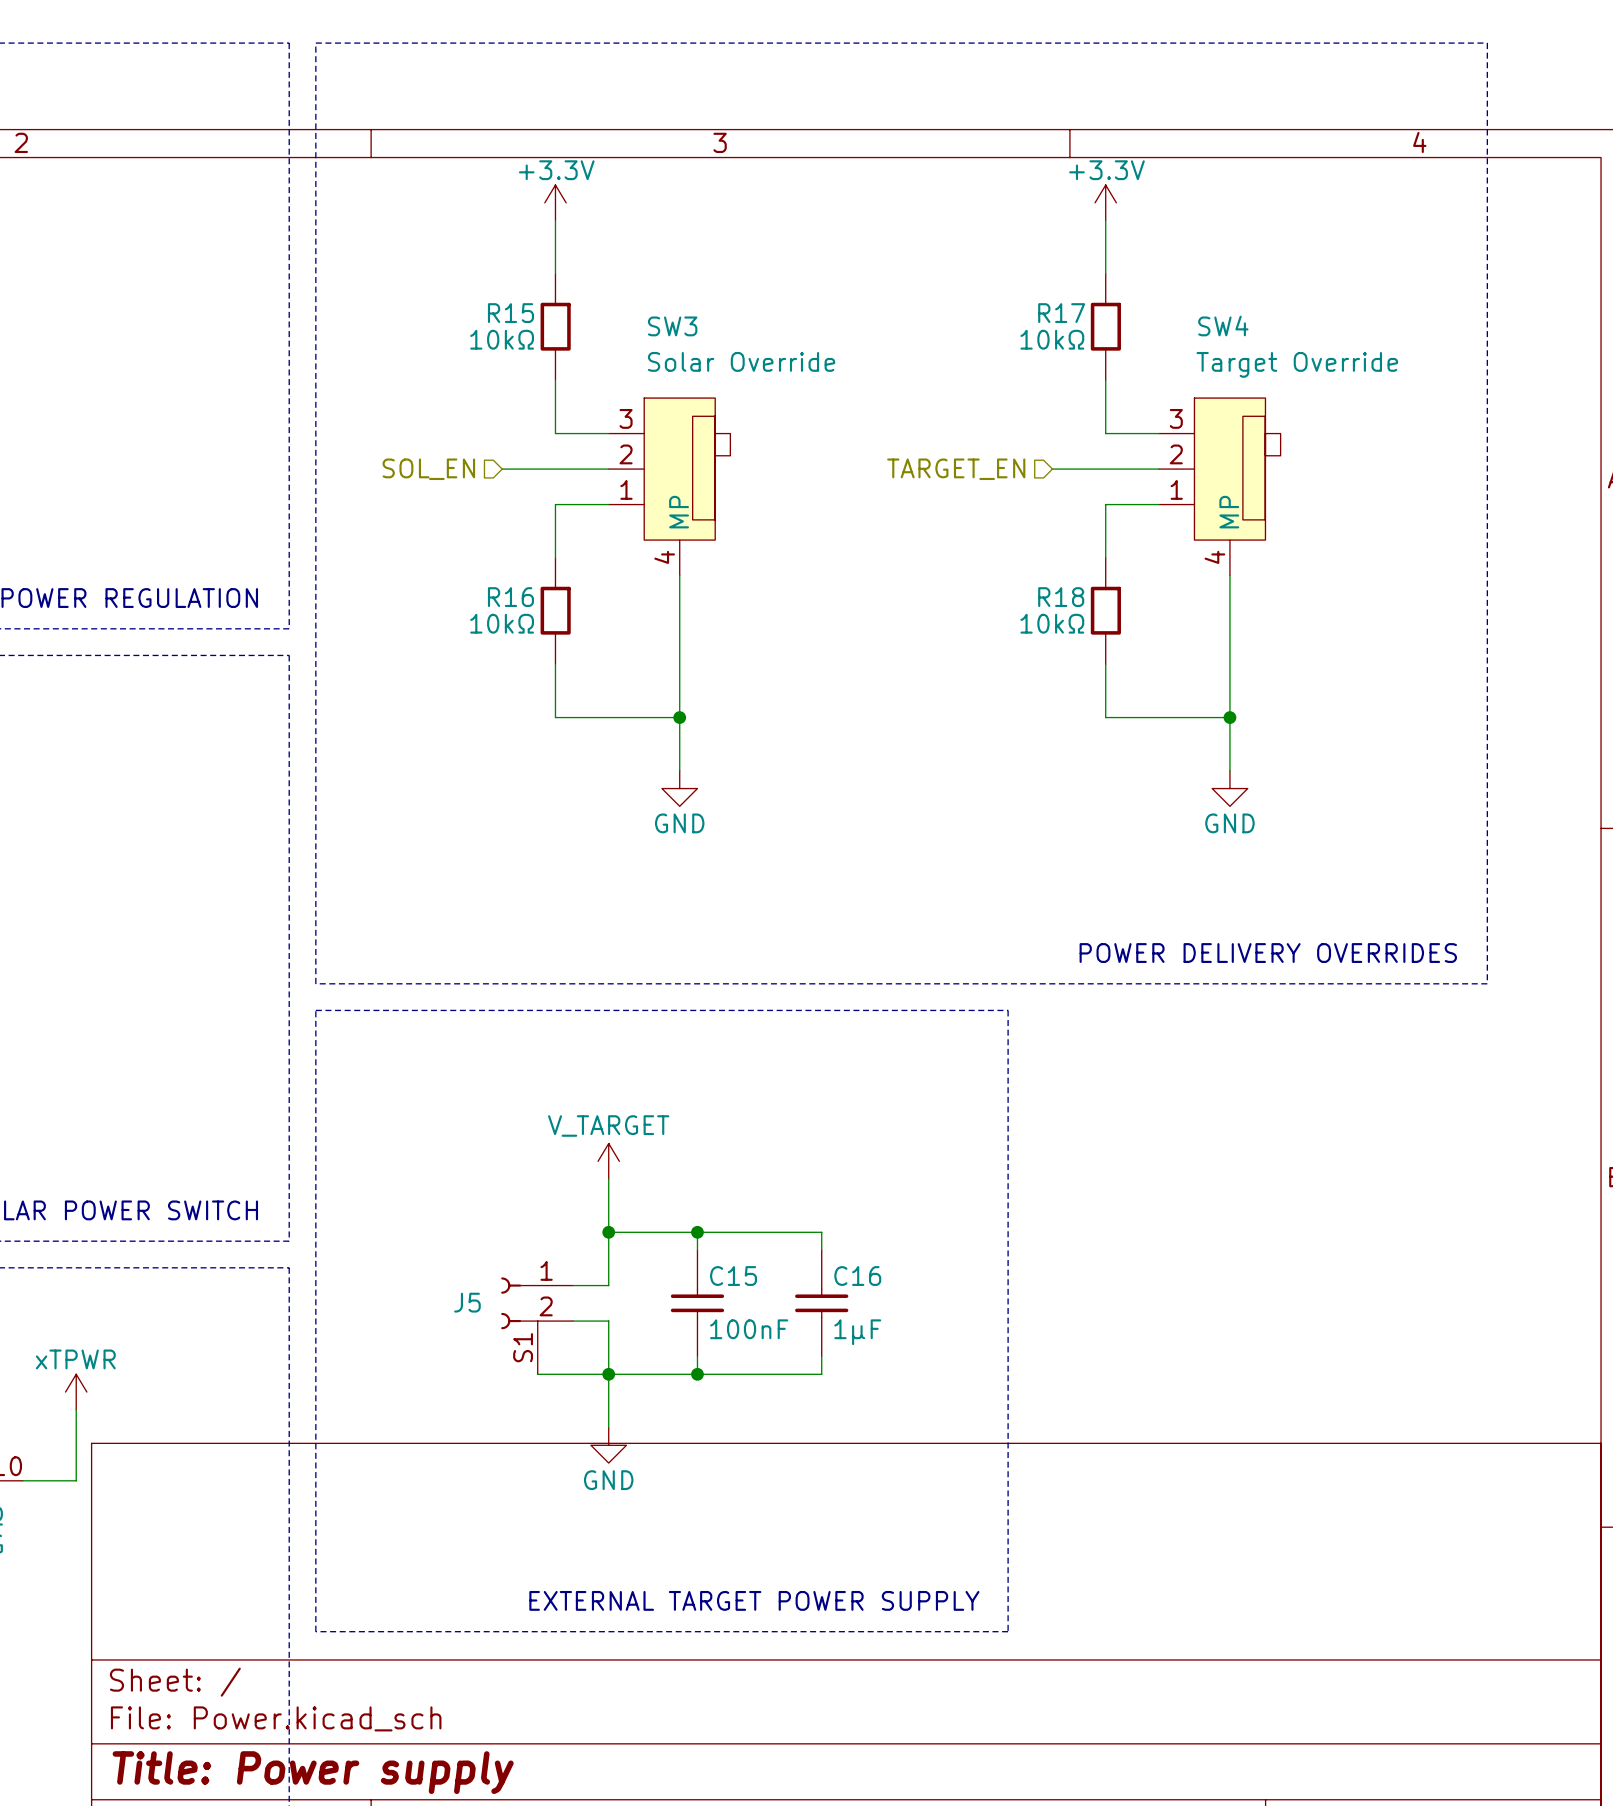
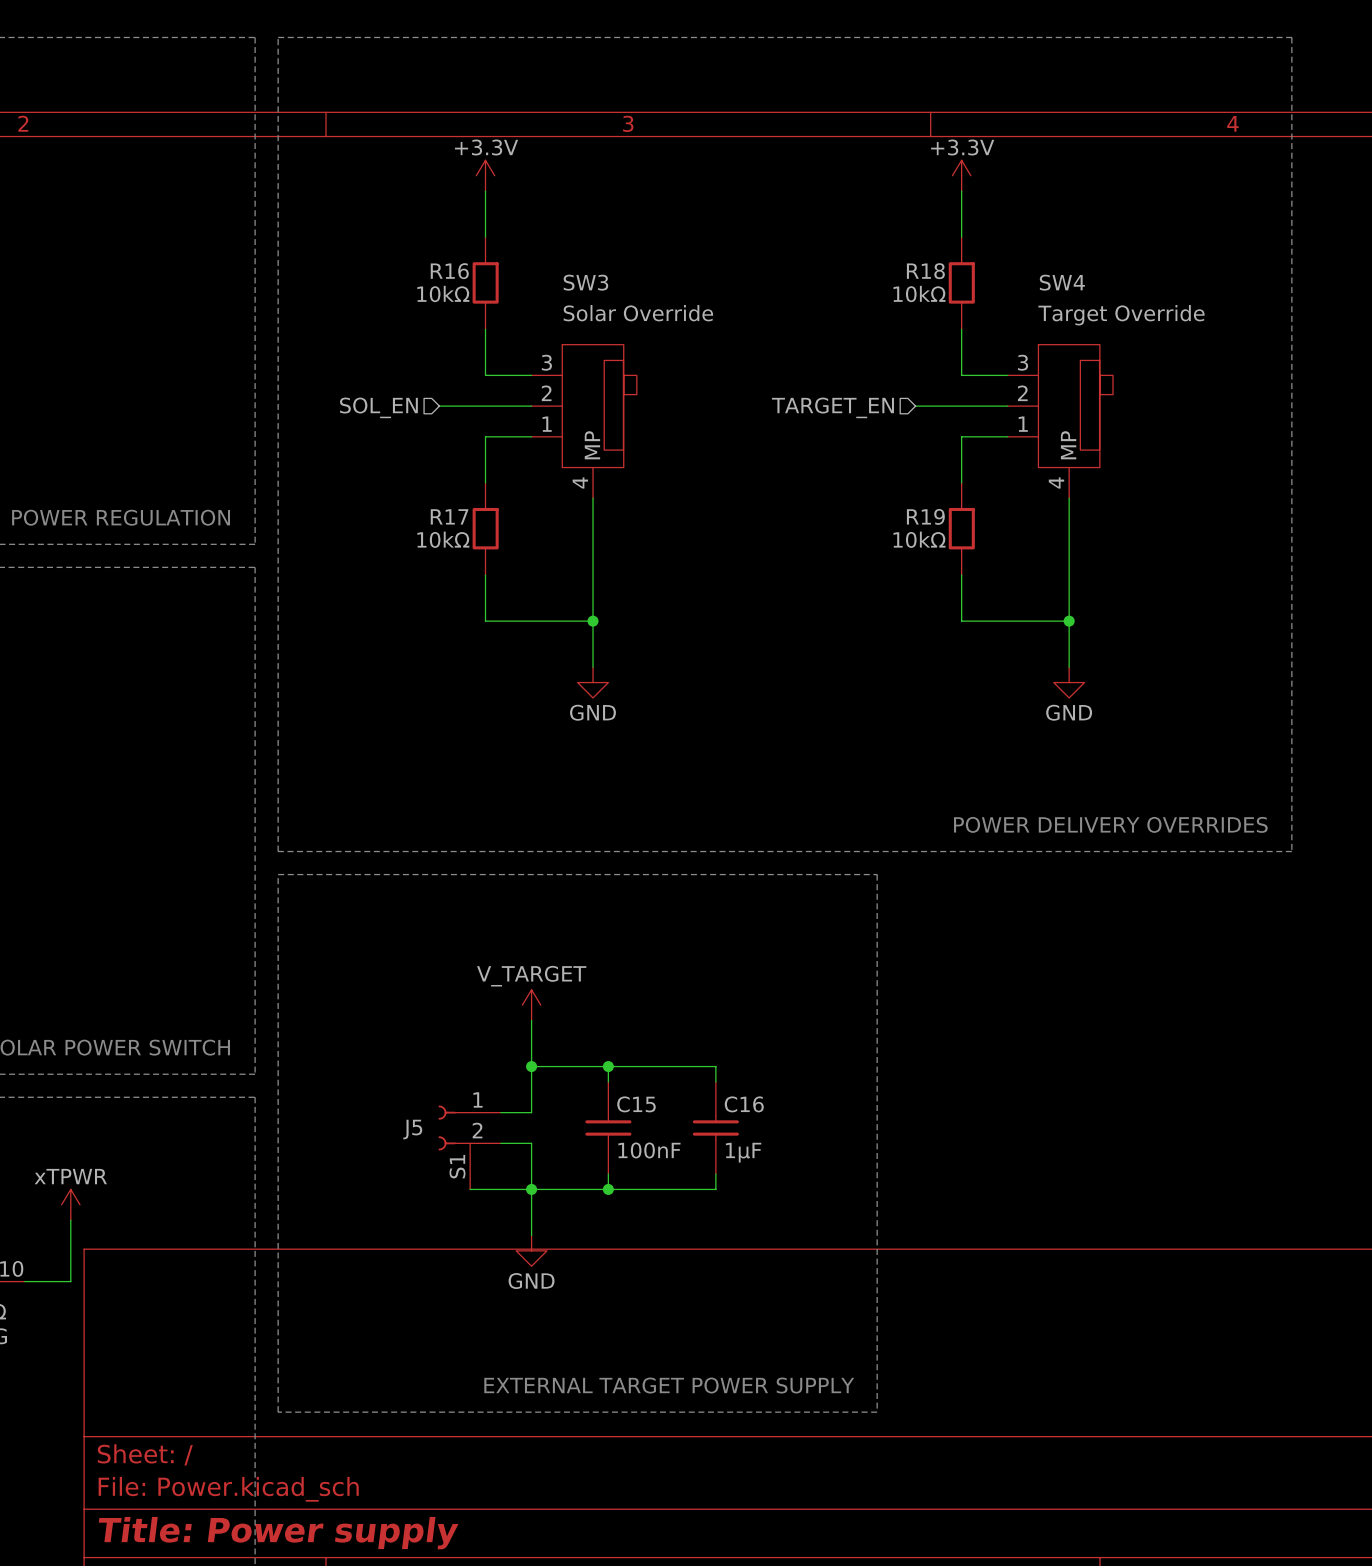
R15 name: R15 (510, 313) -> R16 (449, 271)
R17 name: R17 (1061, 313) -> R18 (925, 271)
R16 name: R16 (510, 597) -> R17 (449, 516)
R18 name: R18 (1061, 597) -> R19 (925, 516)

